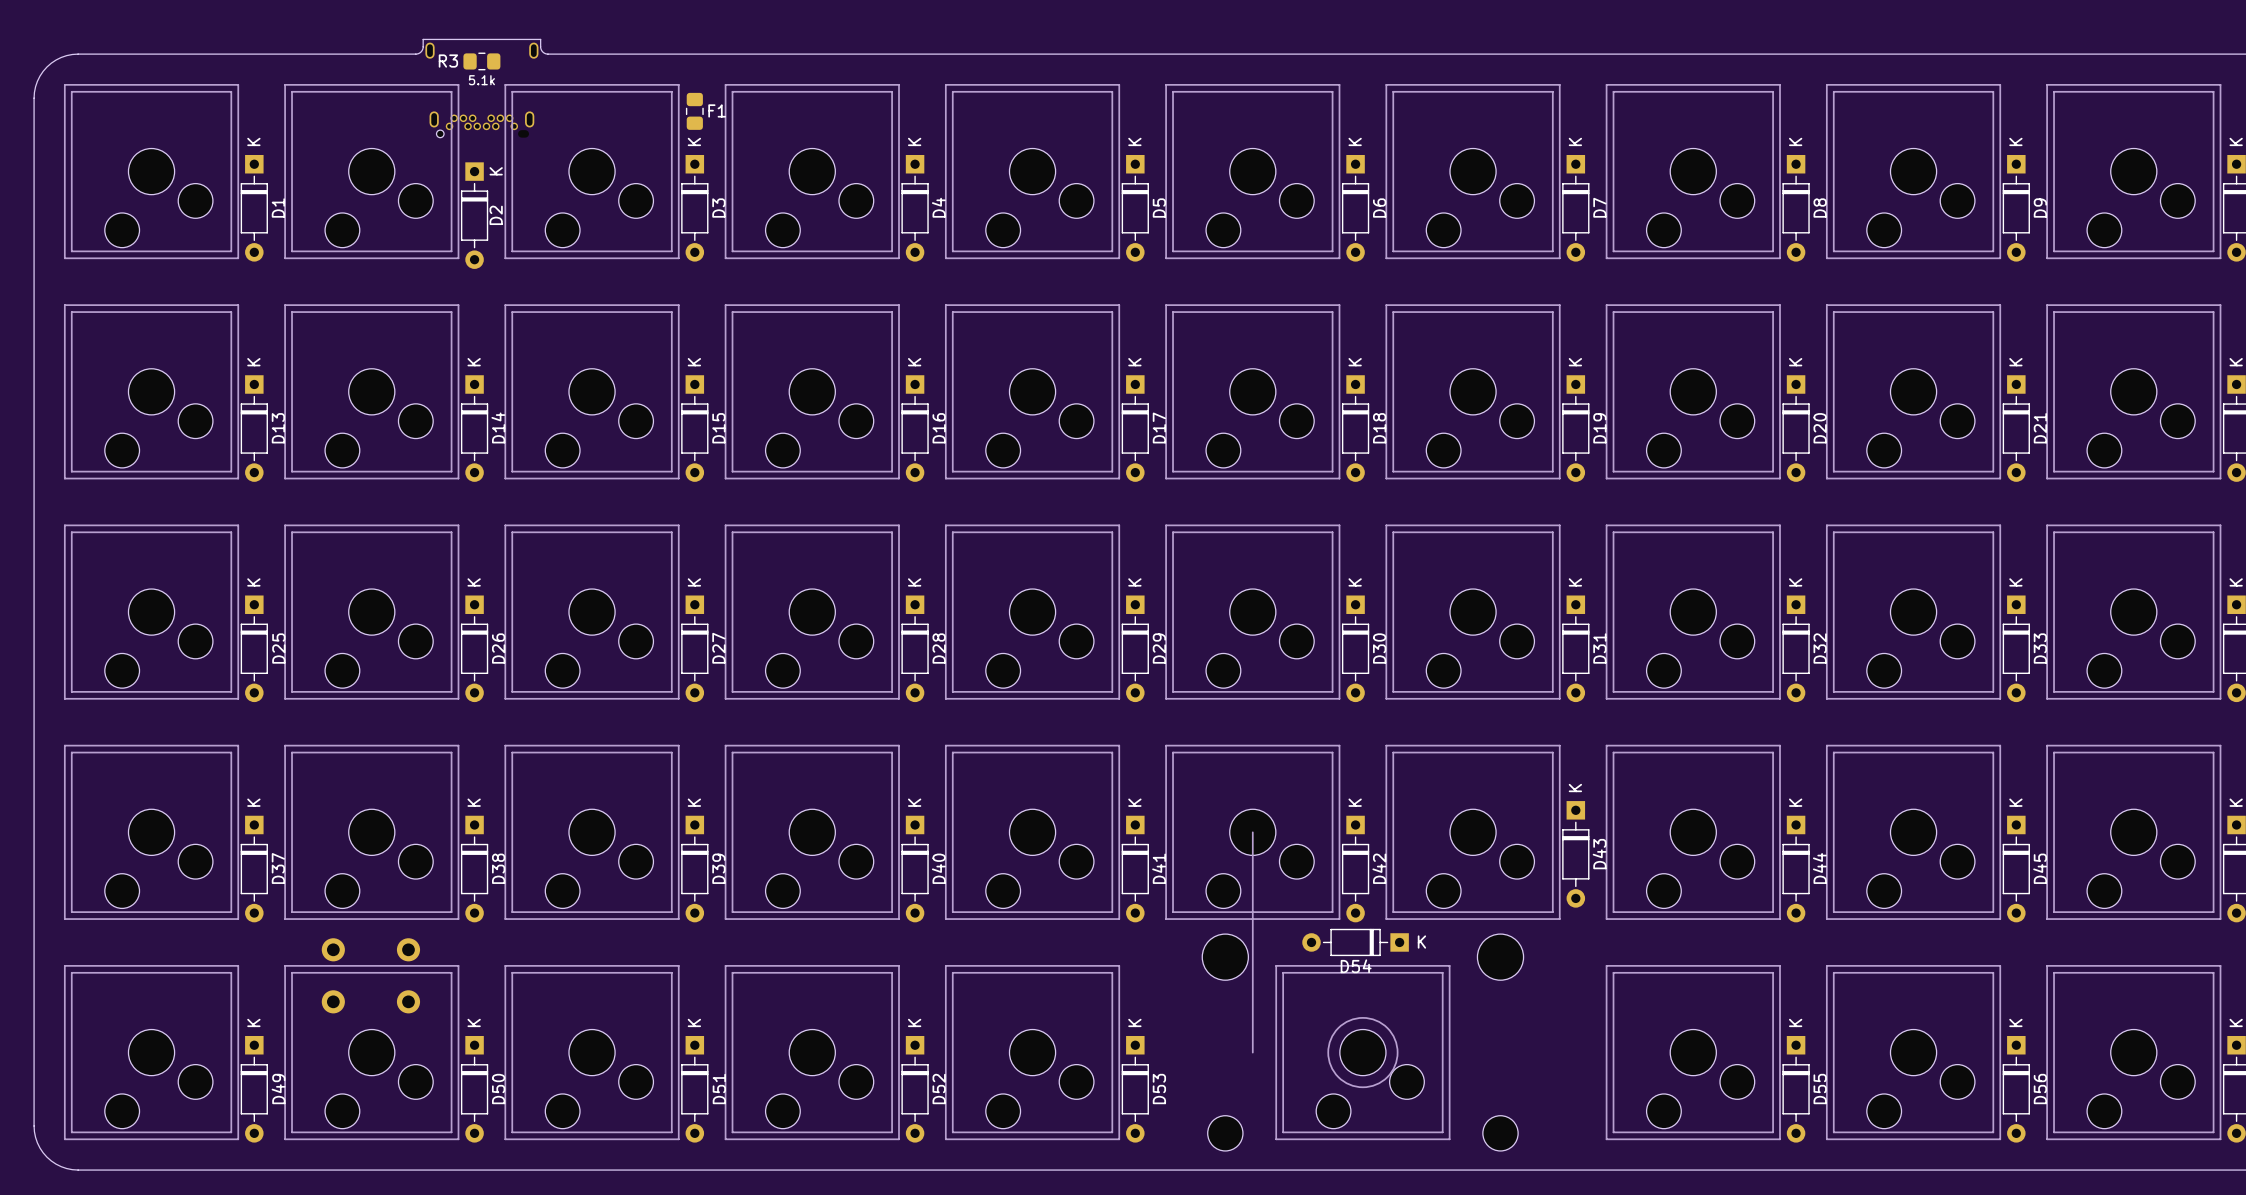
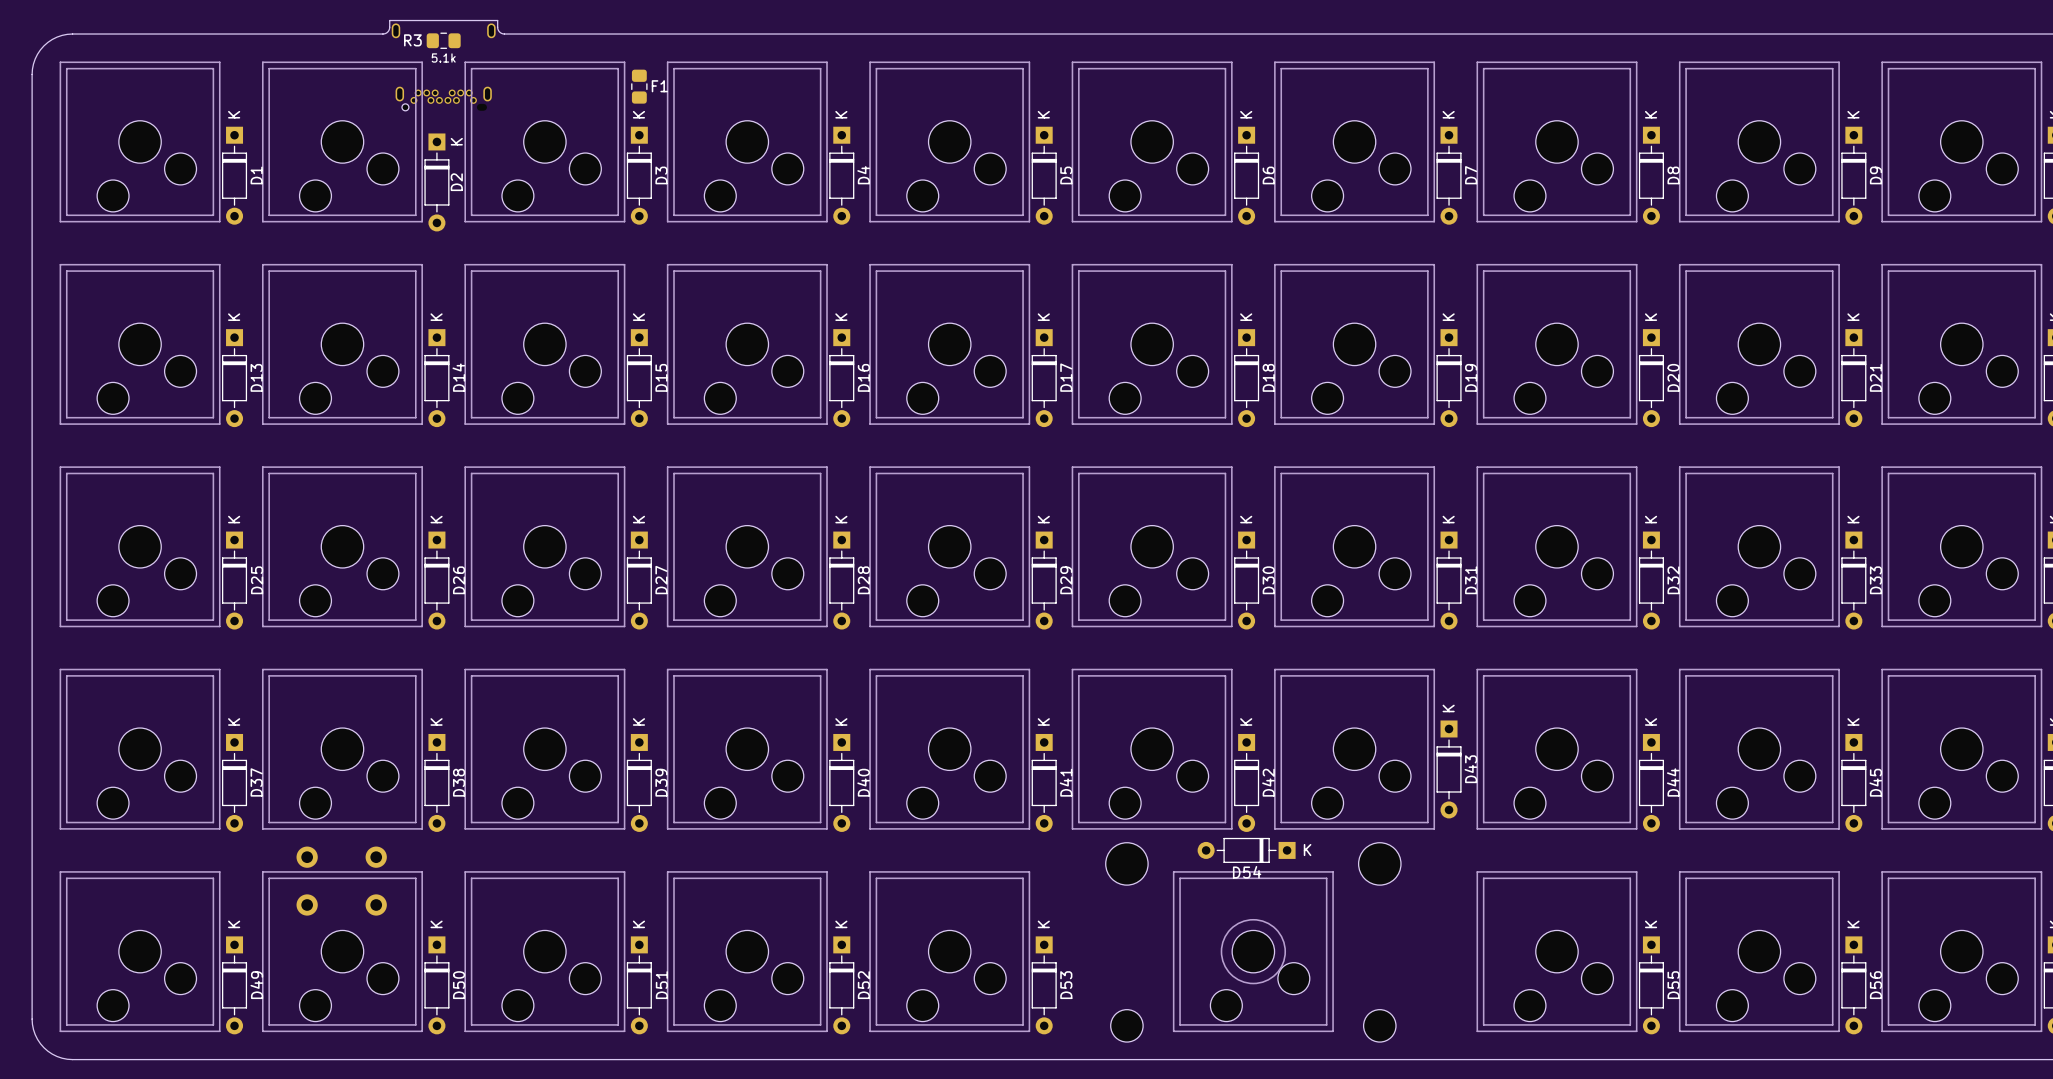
line: (1252, 832) (1252, 1052) -> none

